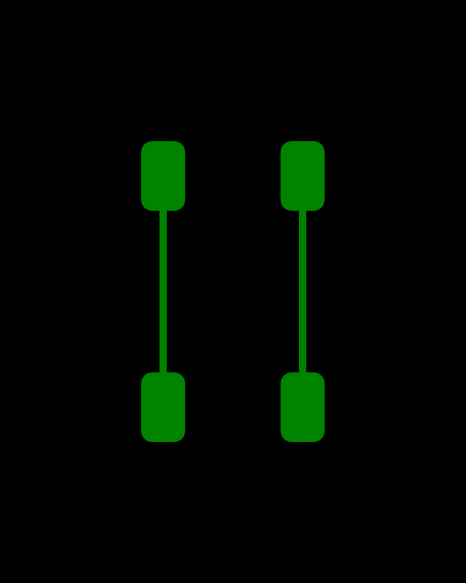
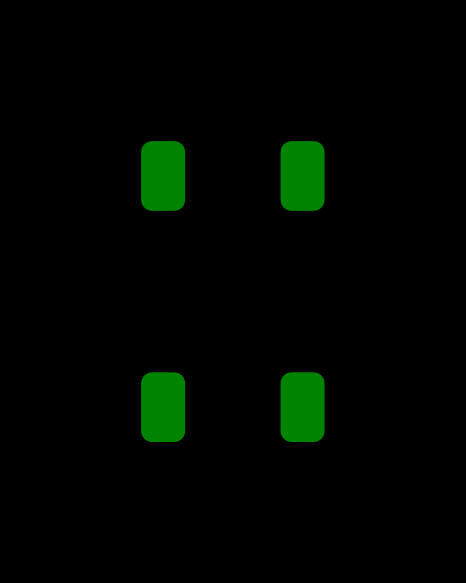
bottom track: (163, 175) (163, 407) -> none
bottom track: (302, 175) (302, 407) -> none

